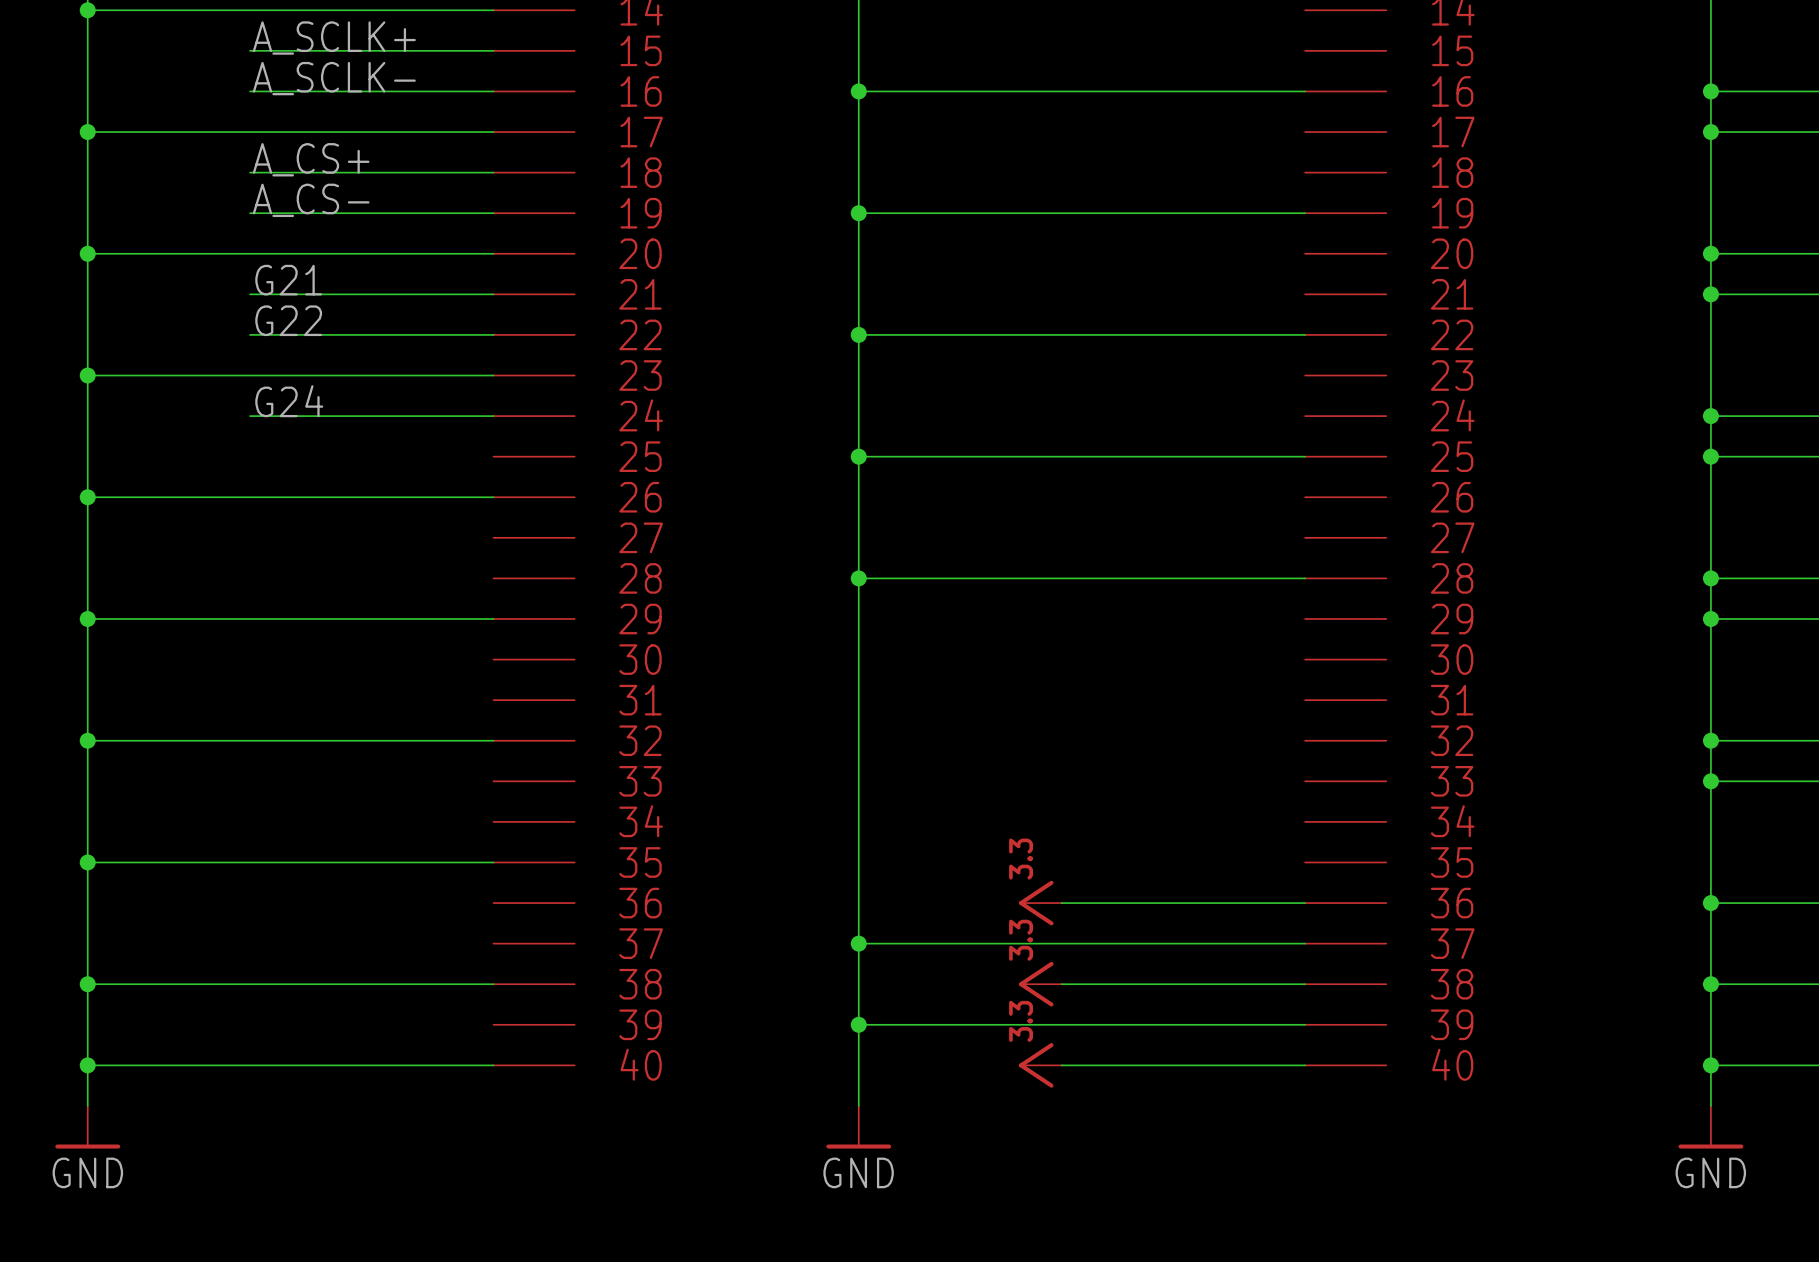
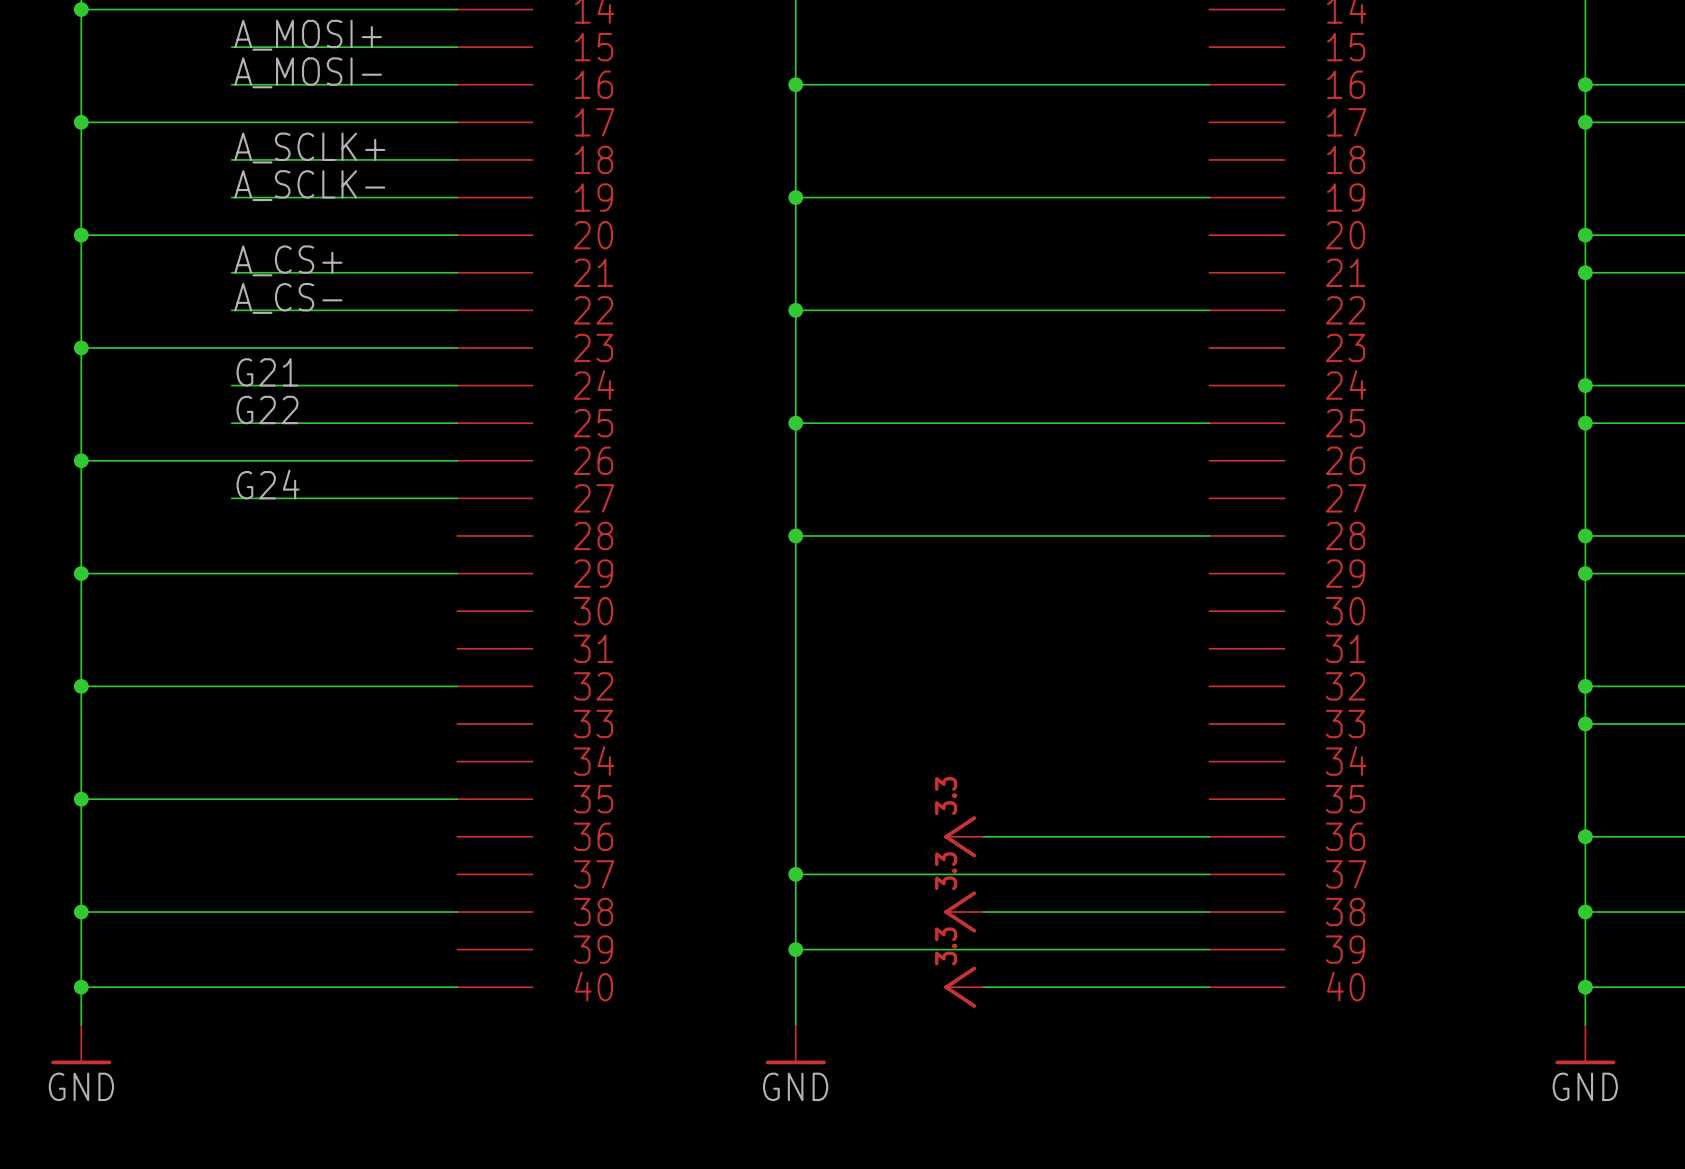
label: A_SCLK+ (334, 38) -> A_MOSI+ (308, 35)
label: A_SCLK- (334, 78) -> A_MOSI- (308, 72)
label: A_CS+ (311, 159) -> A_SCLK+ (309, 148)
label: A_CS- (311, 200) -> A_SCLK- (309, 185)
label: G21 (288, 280) -> A_CS+ (288, 260)
label: G22 (288, 320) -> A_CS- (288, 298)
label: G24 (289, 401) -> G21 (267, 372)
label: none -> G22 (267, 410)
wire: none -> (231, 423) (457, 423)
label: none -> G24 (268, 484)
wire: none -> (231, 498) (457, 498)

